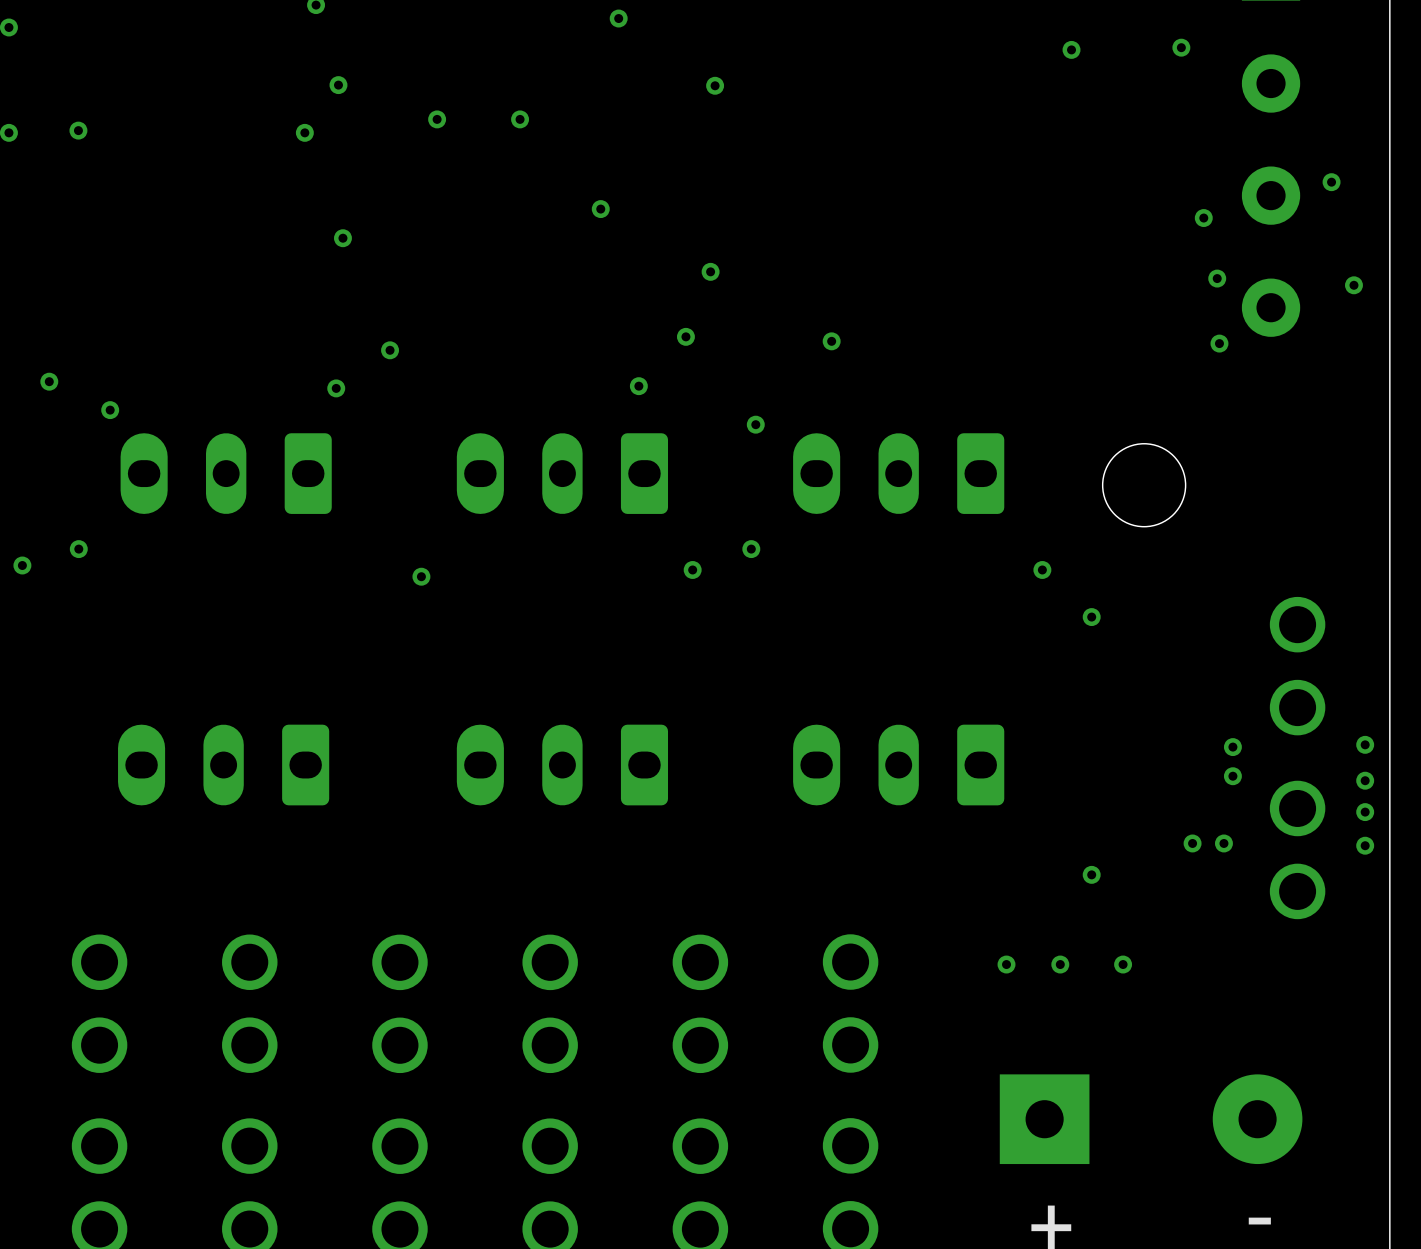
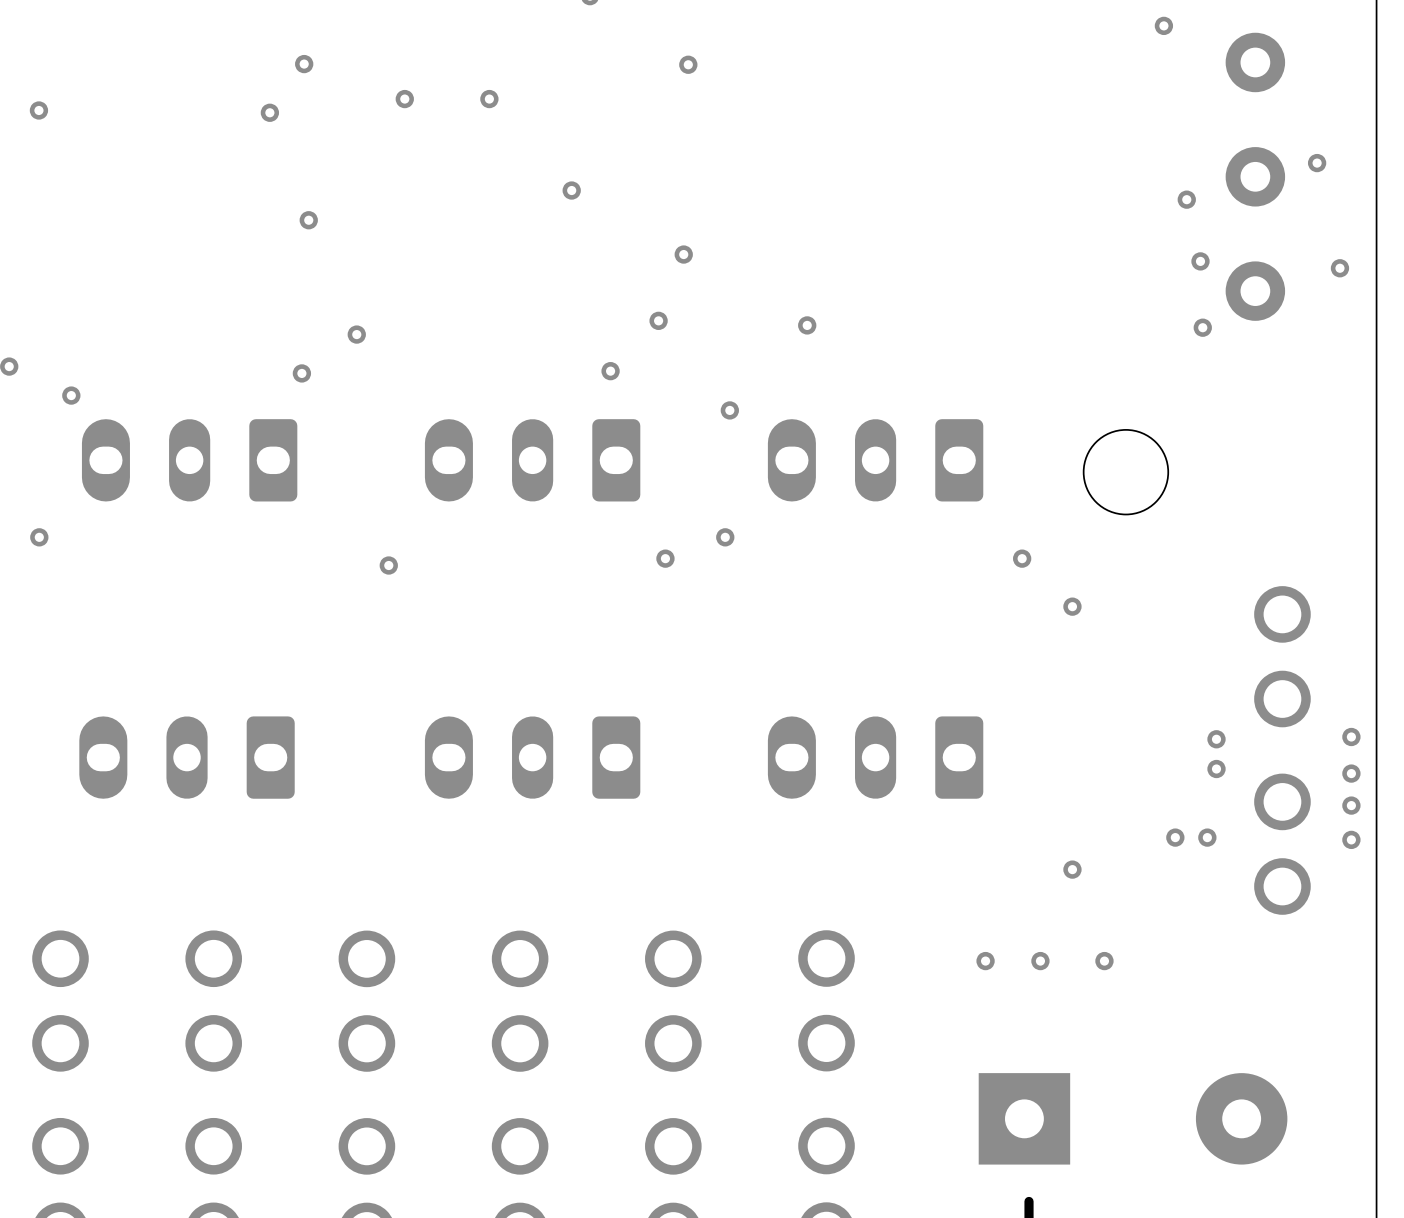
via: (1071, 49) -> none

